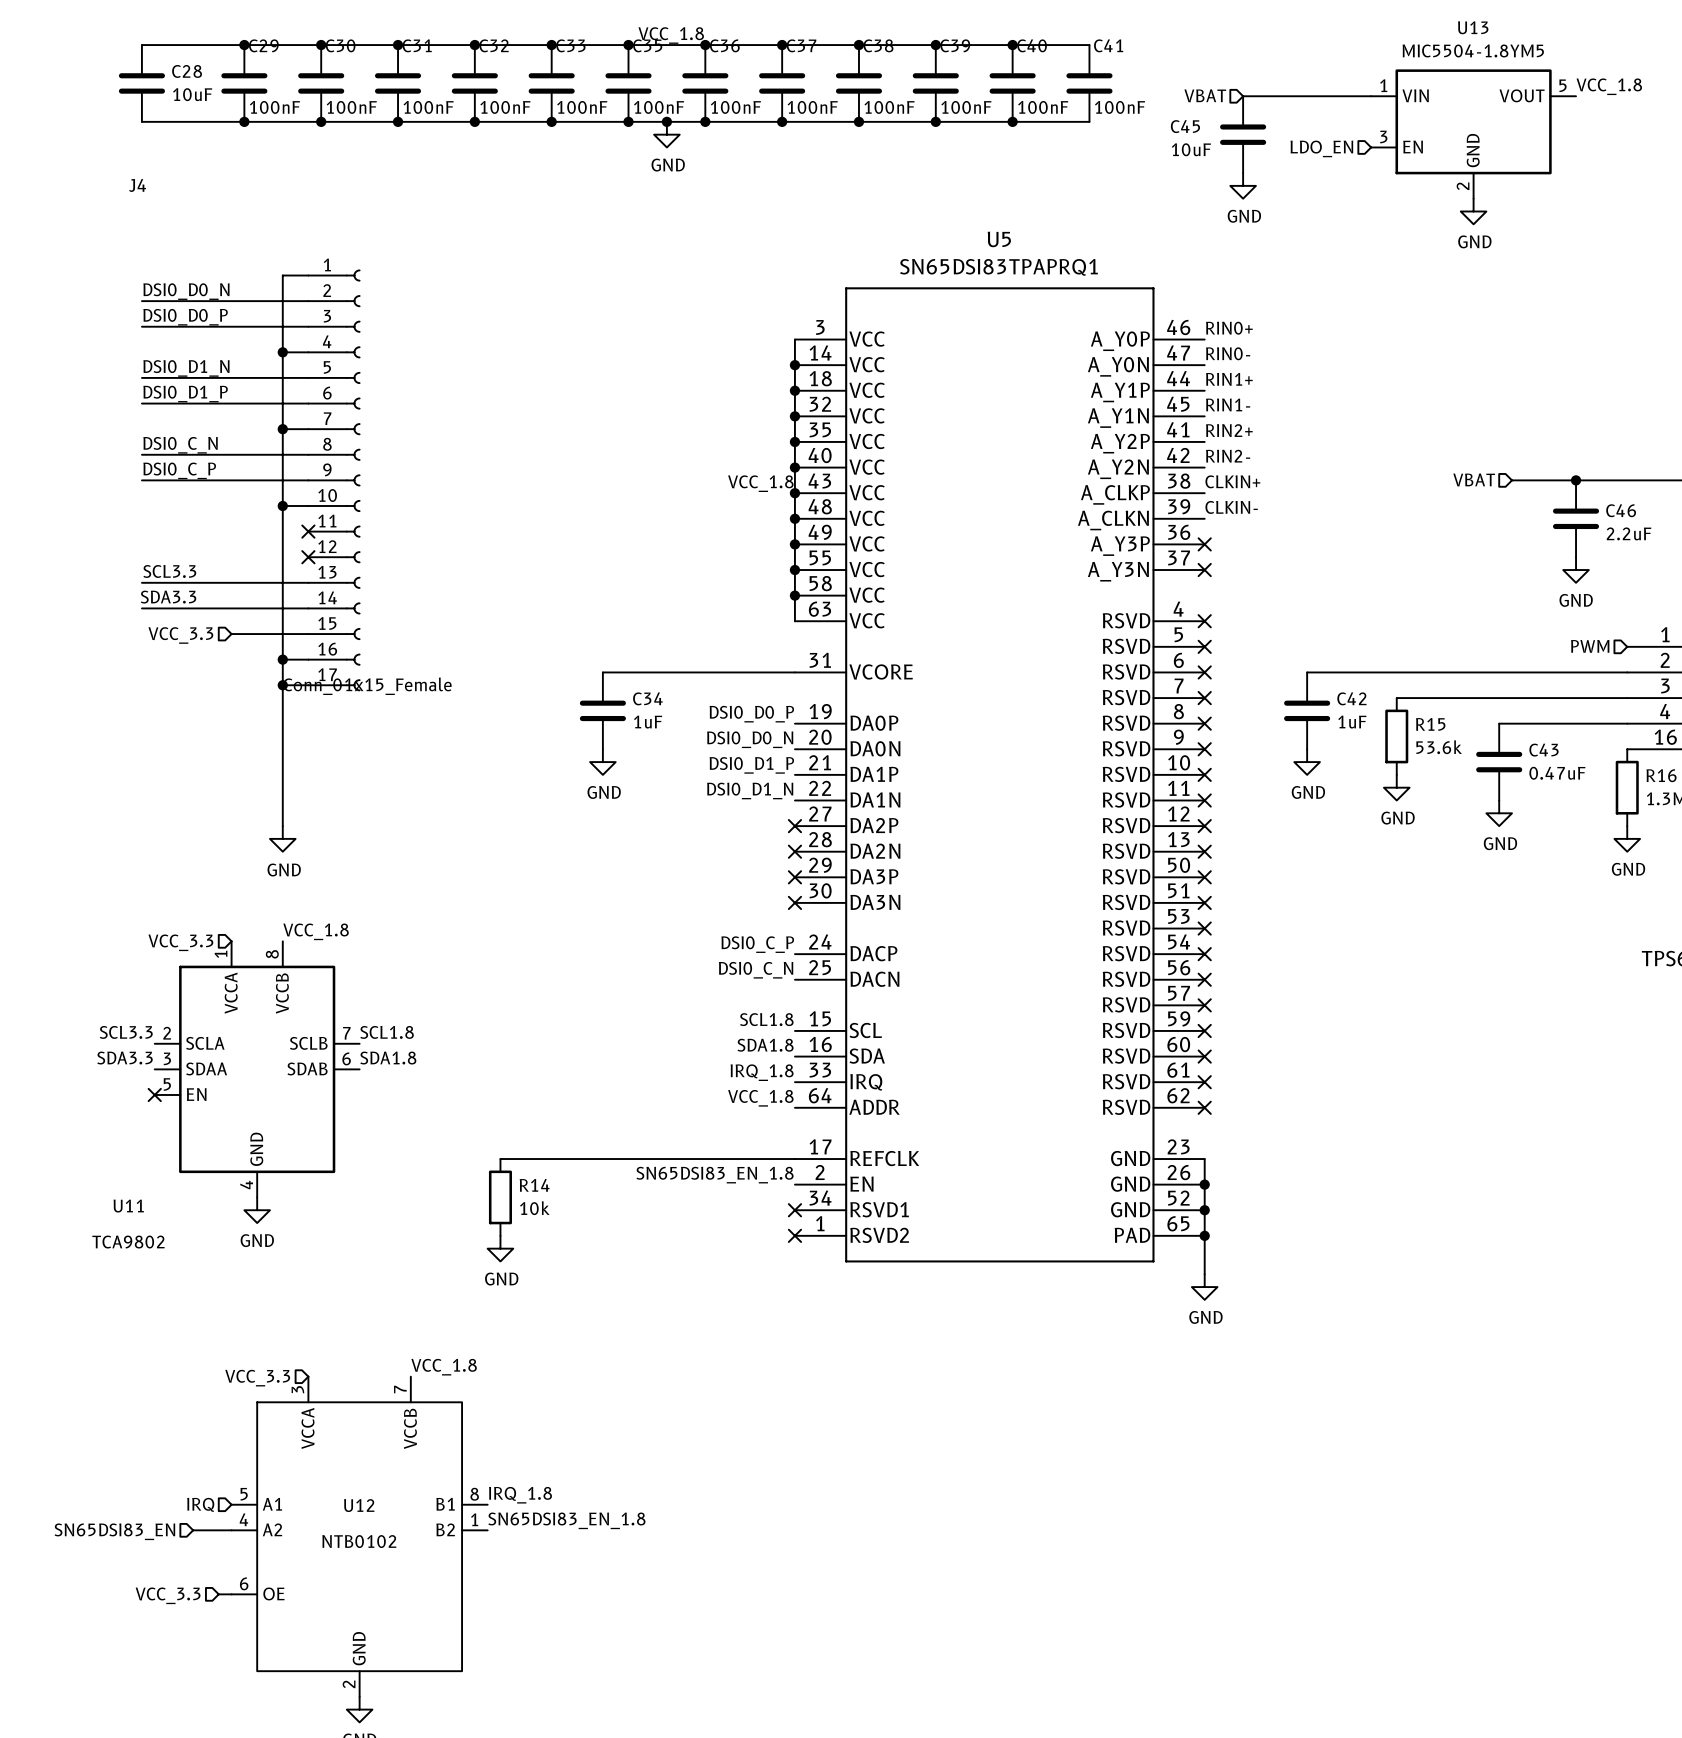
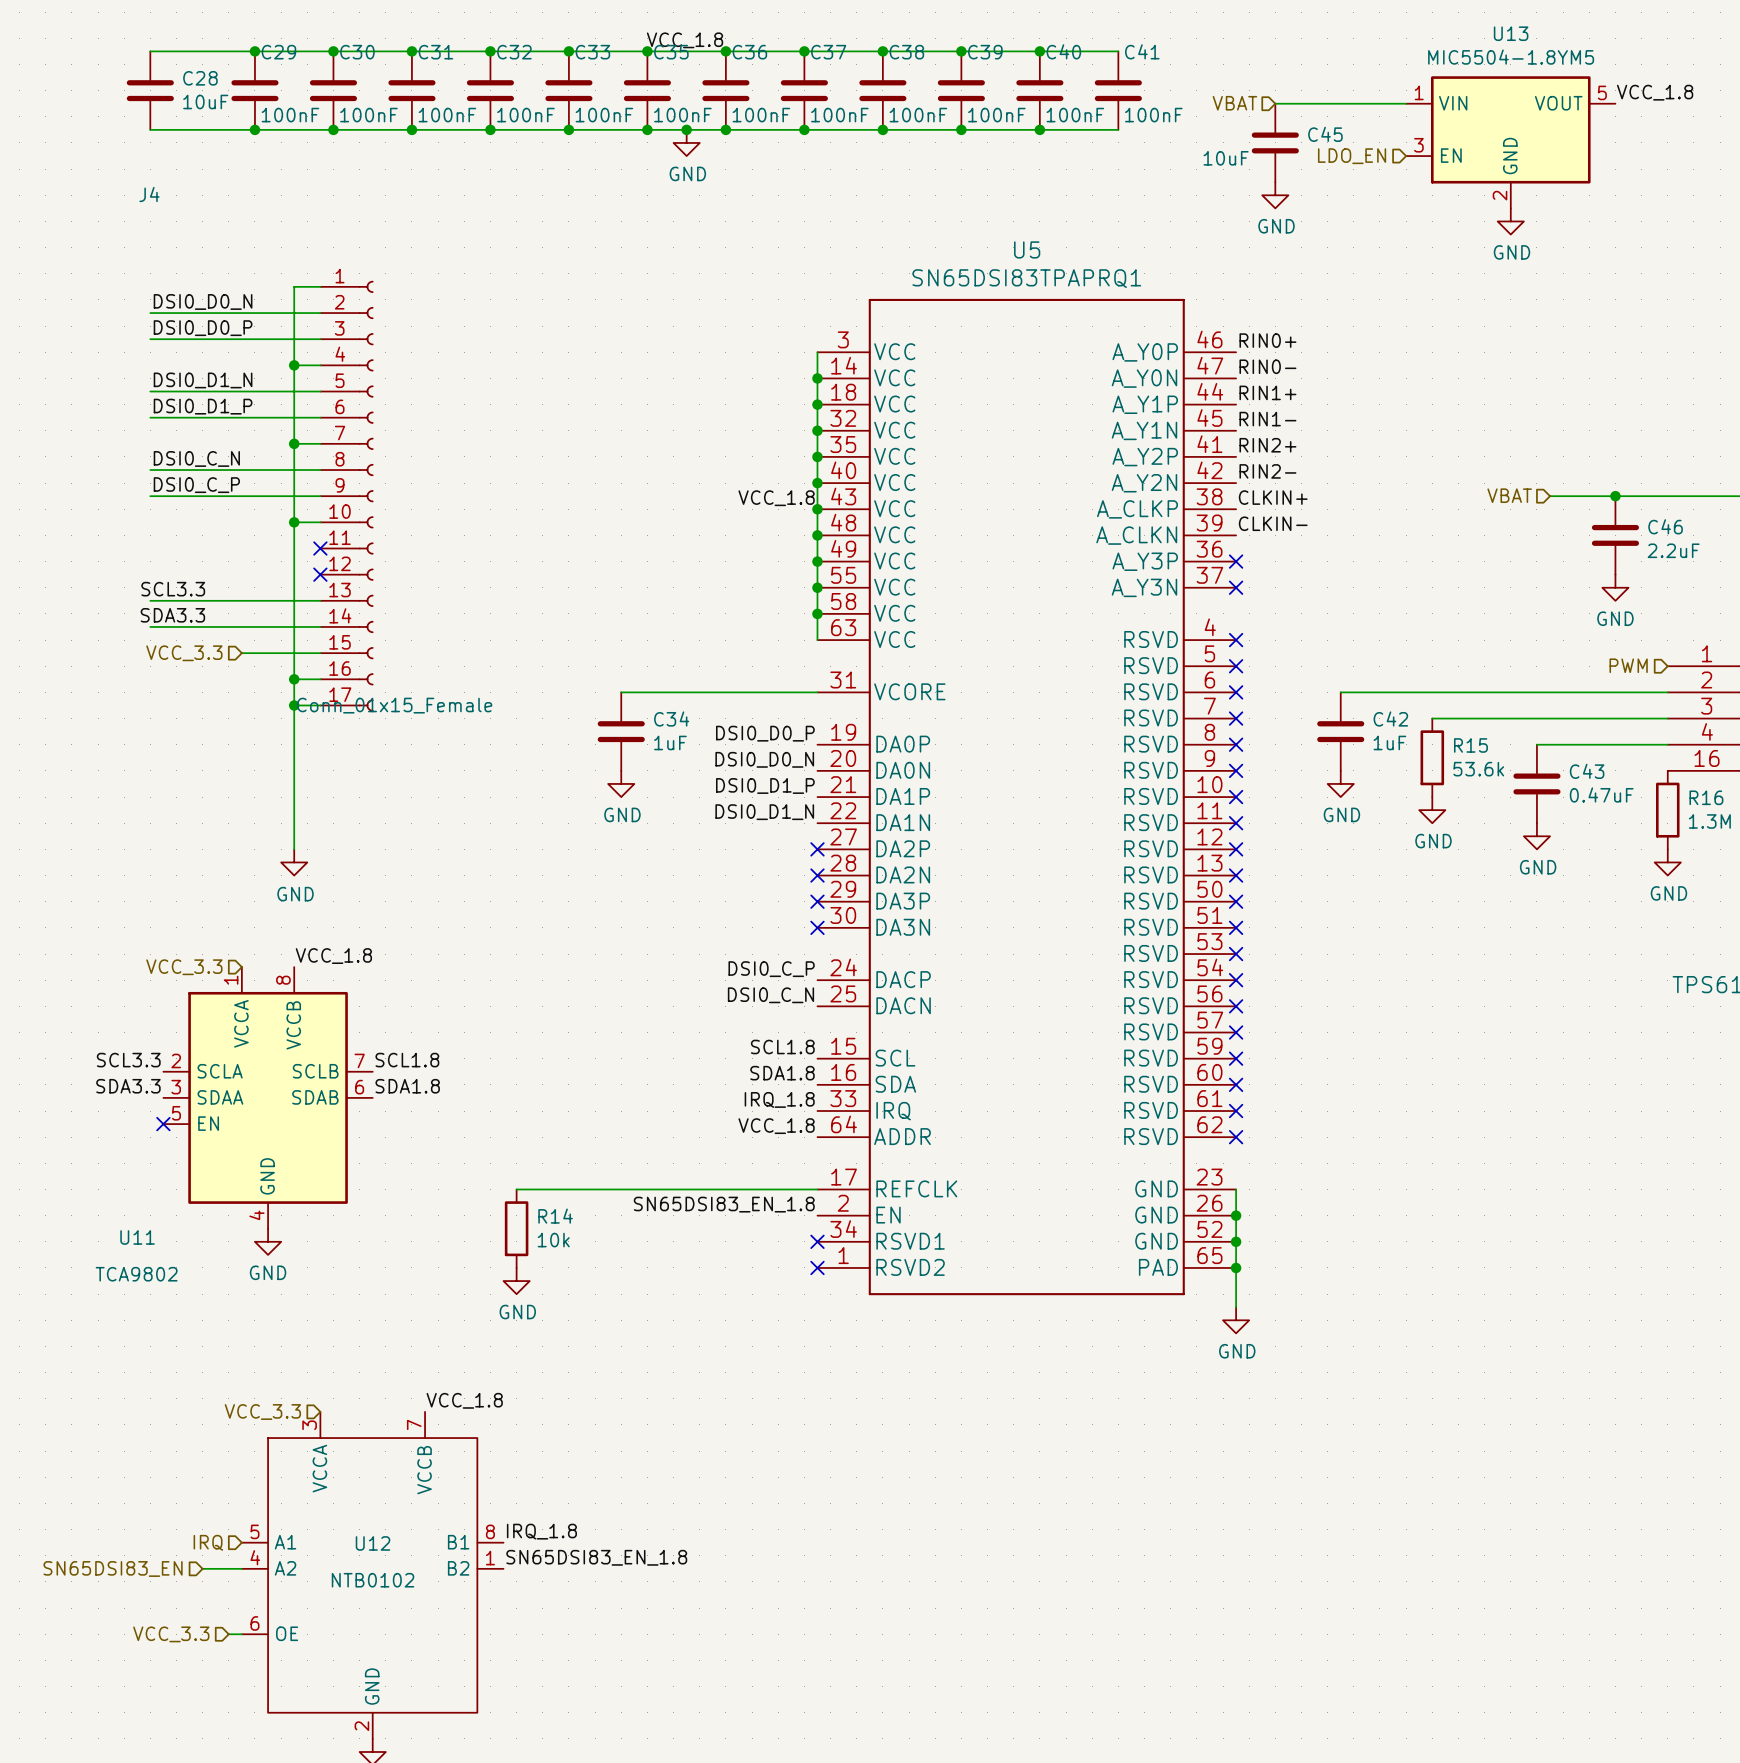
C45 name position: C45 (1185, 126) -> C45 (1325, 134)

